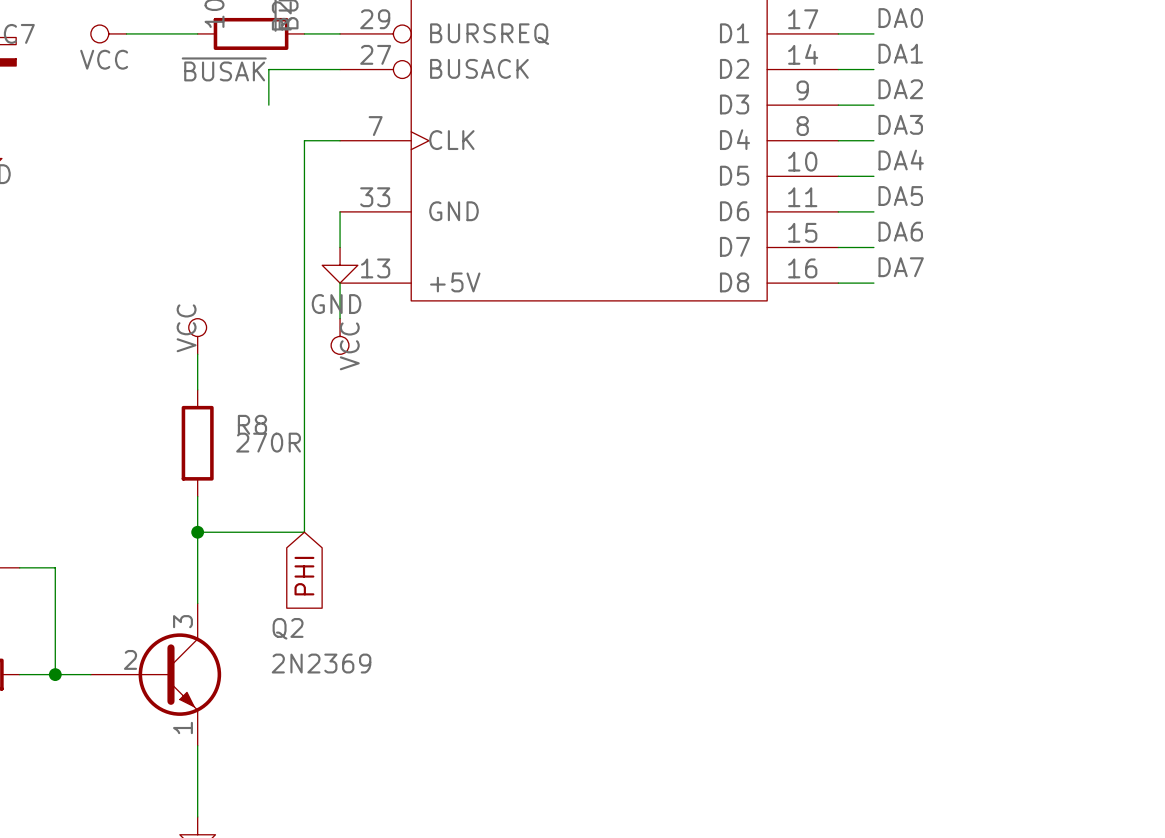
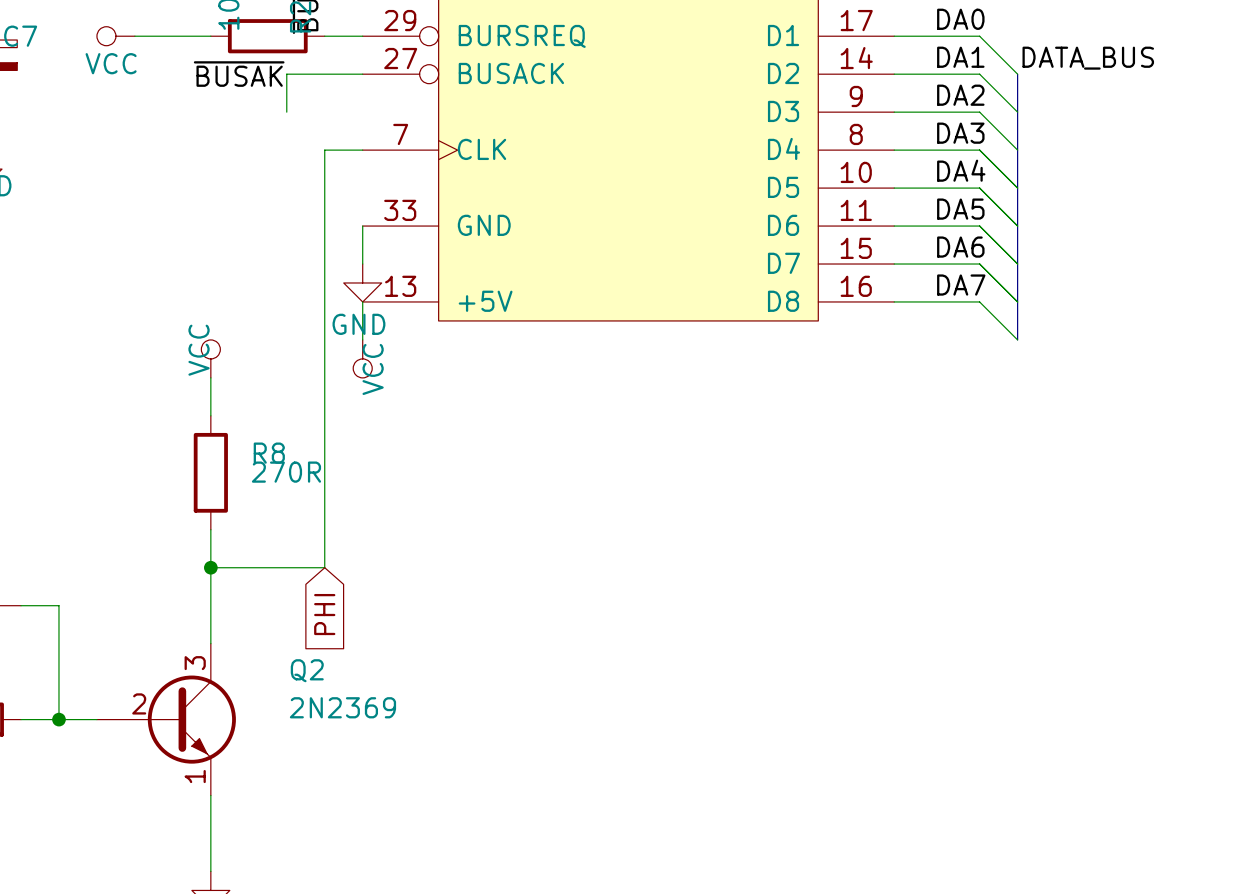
wire: none -> (932, 36) (979, 36) (1017, 74)
label: none -> DATA_BUS (1088, 58)
wire: none -> (932, 74) (979, 74) (1017, 112)
bus: none -> (1017, 74) (1017, 339)
wire: none -> (932, 112) (979, 112) (1017, 150)
wire: none -> (932, 150) (979, 150) (1017, 188)
wire: none -> (932, 188) (979, 188) (1017, 226)
wire: none -> (932, 226) (979, 226) (1017, 264)
wire: none -> (932, 264) (979, 264) (1017, 301)
wire: none -> (932, 301) (979, 301) (1017, 339)

